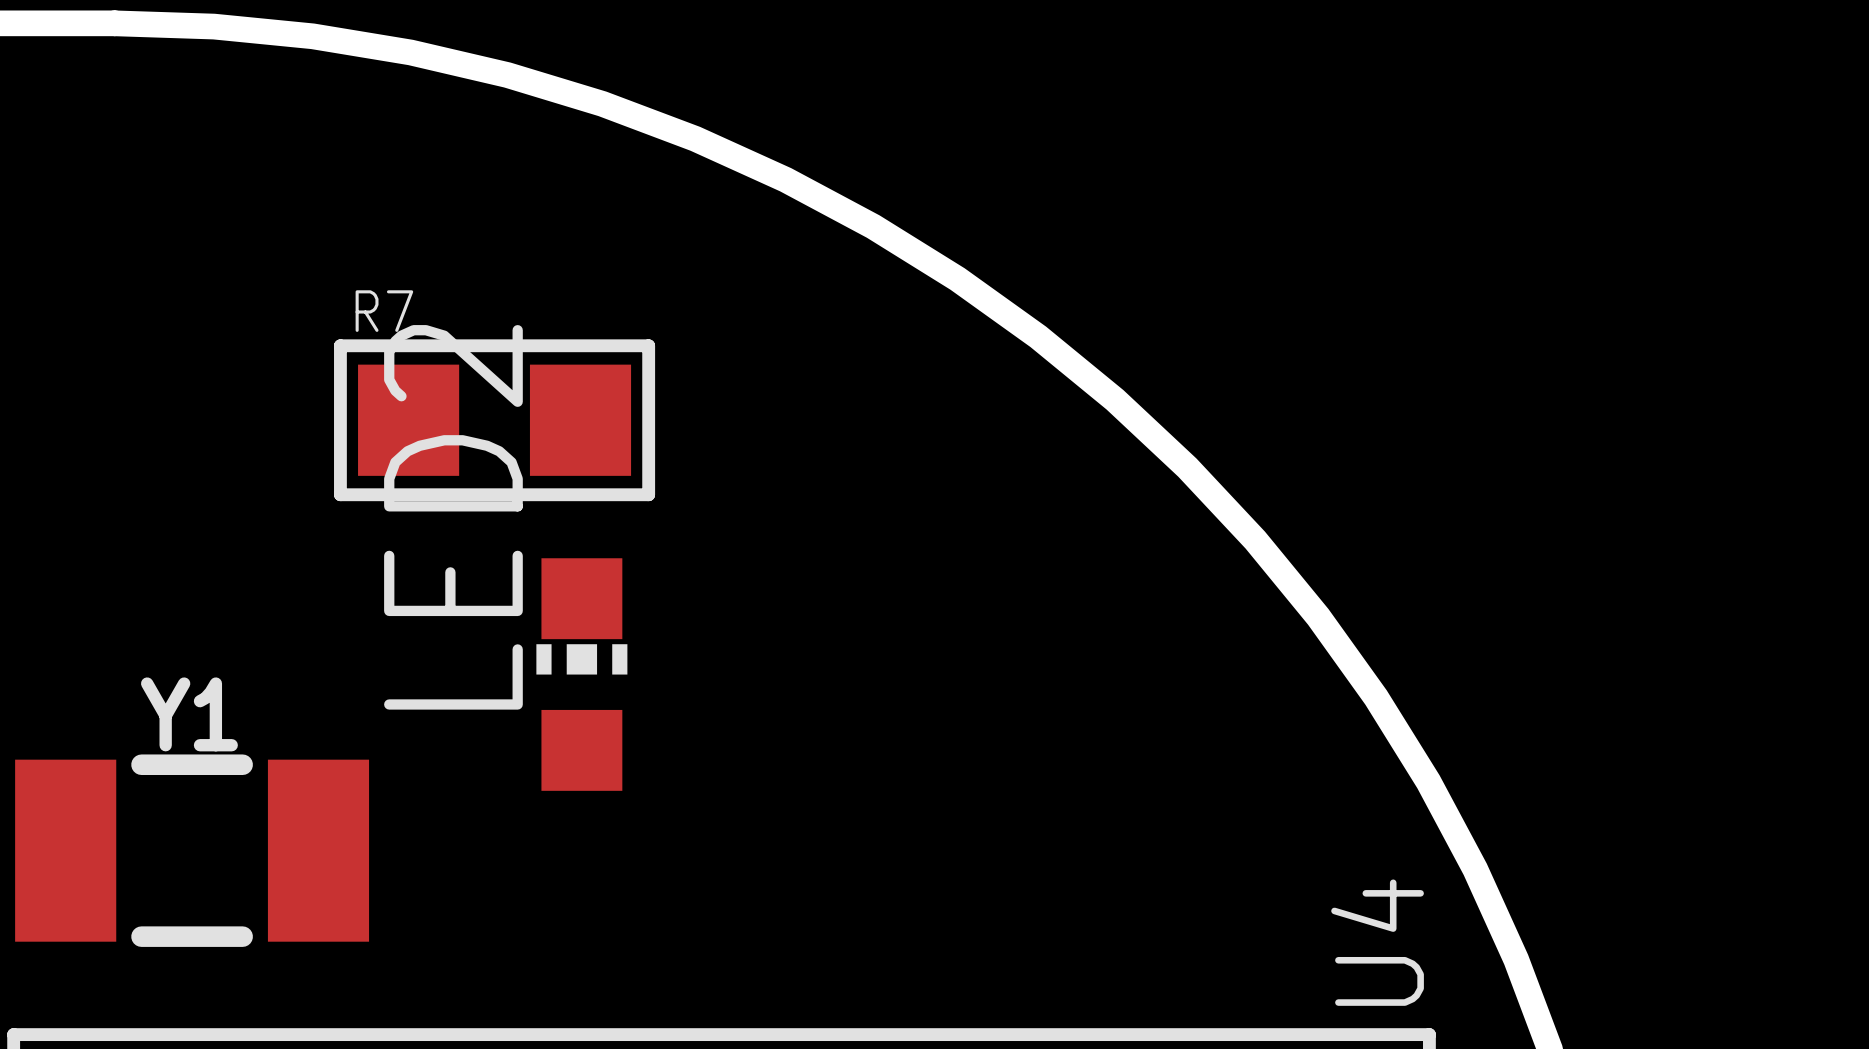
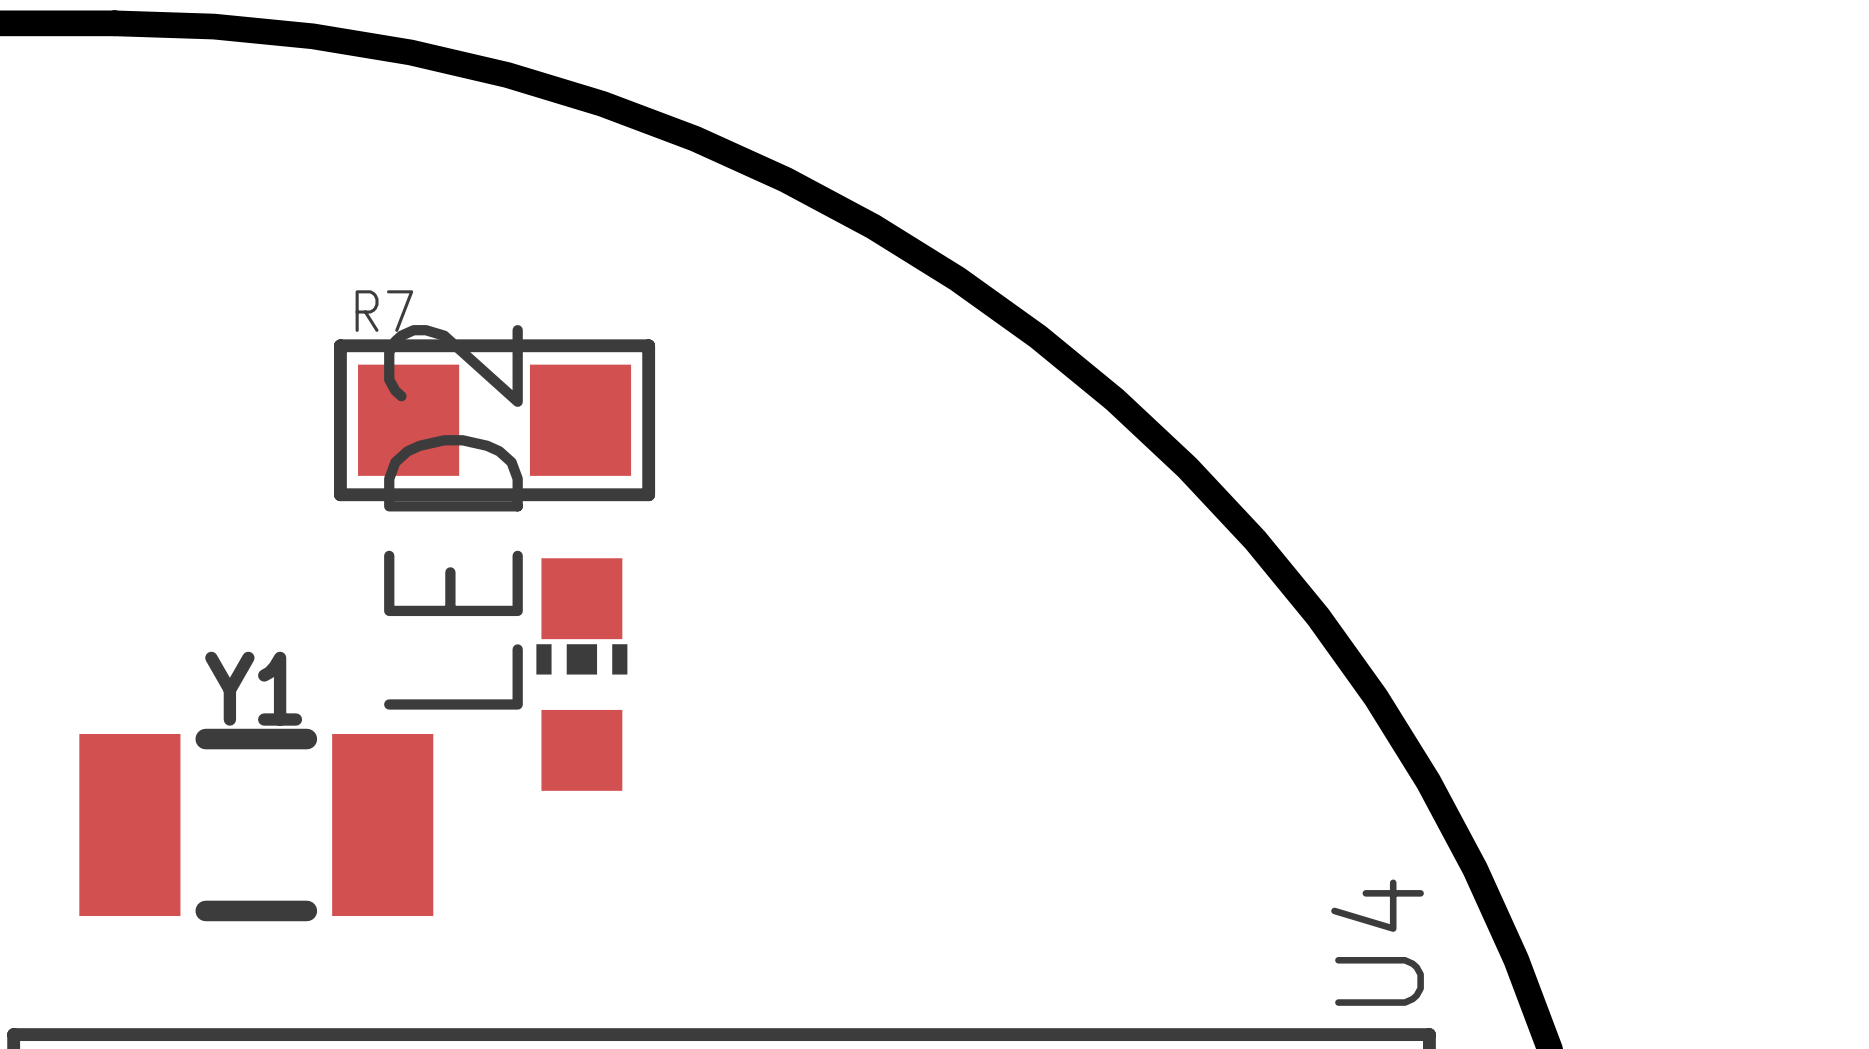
Y1 position: (192, 850) -> (256, 825)

